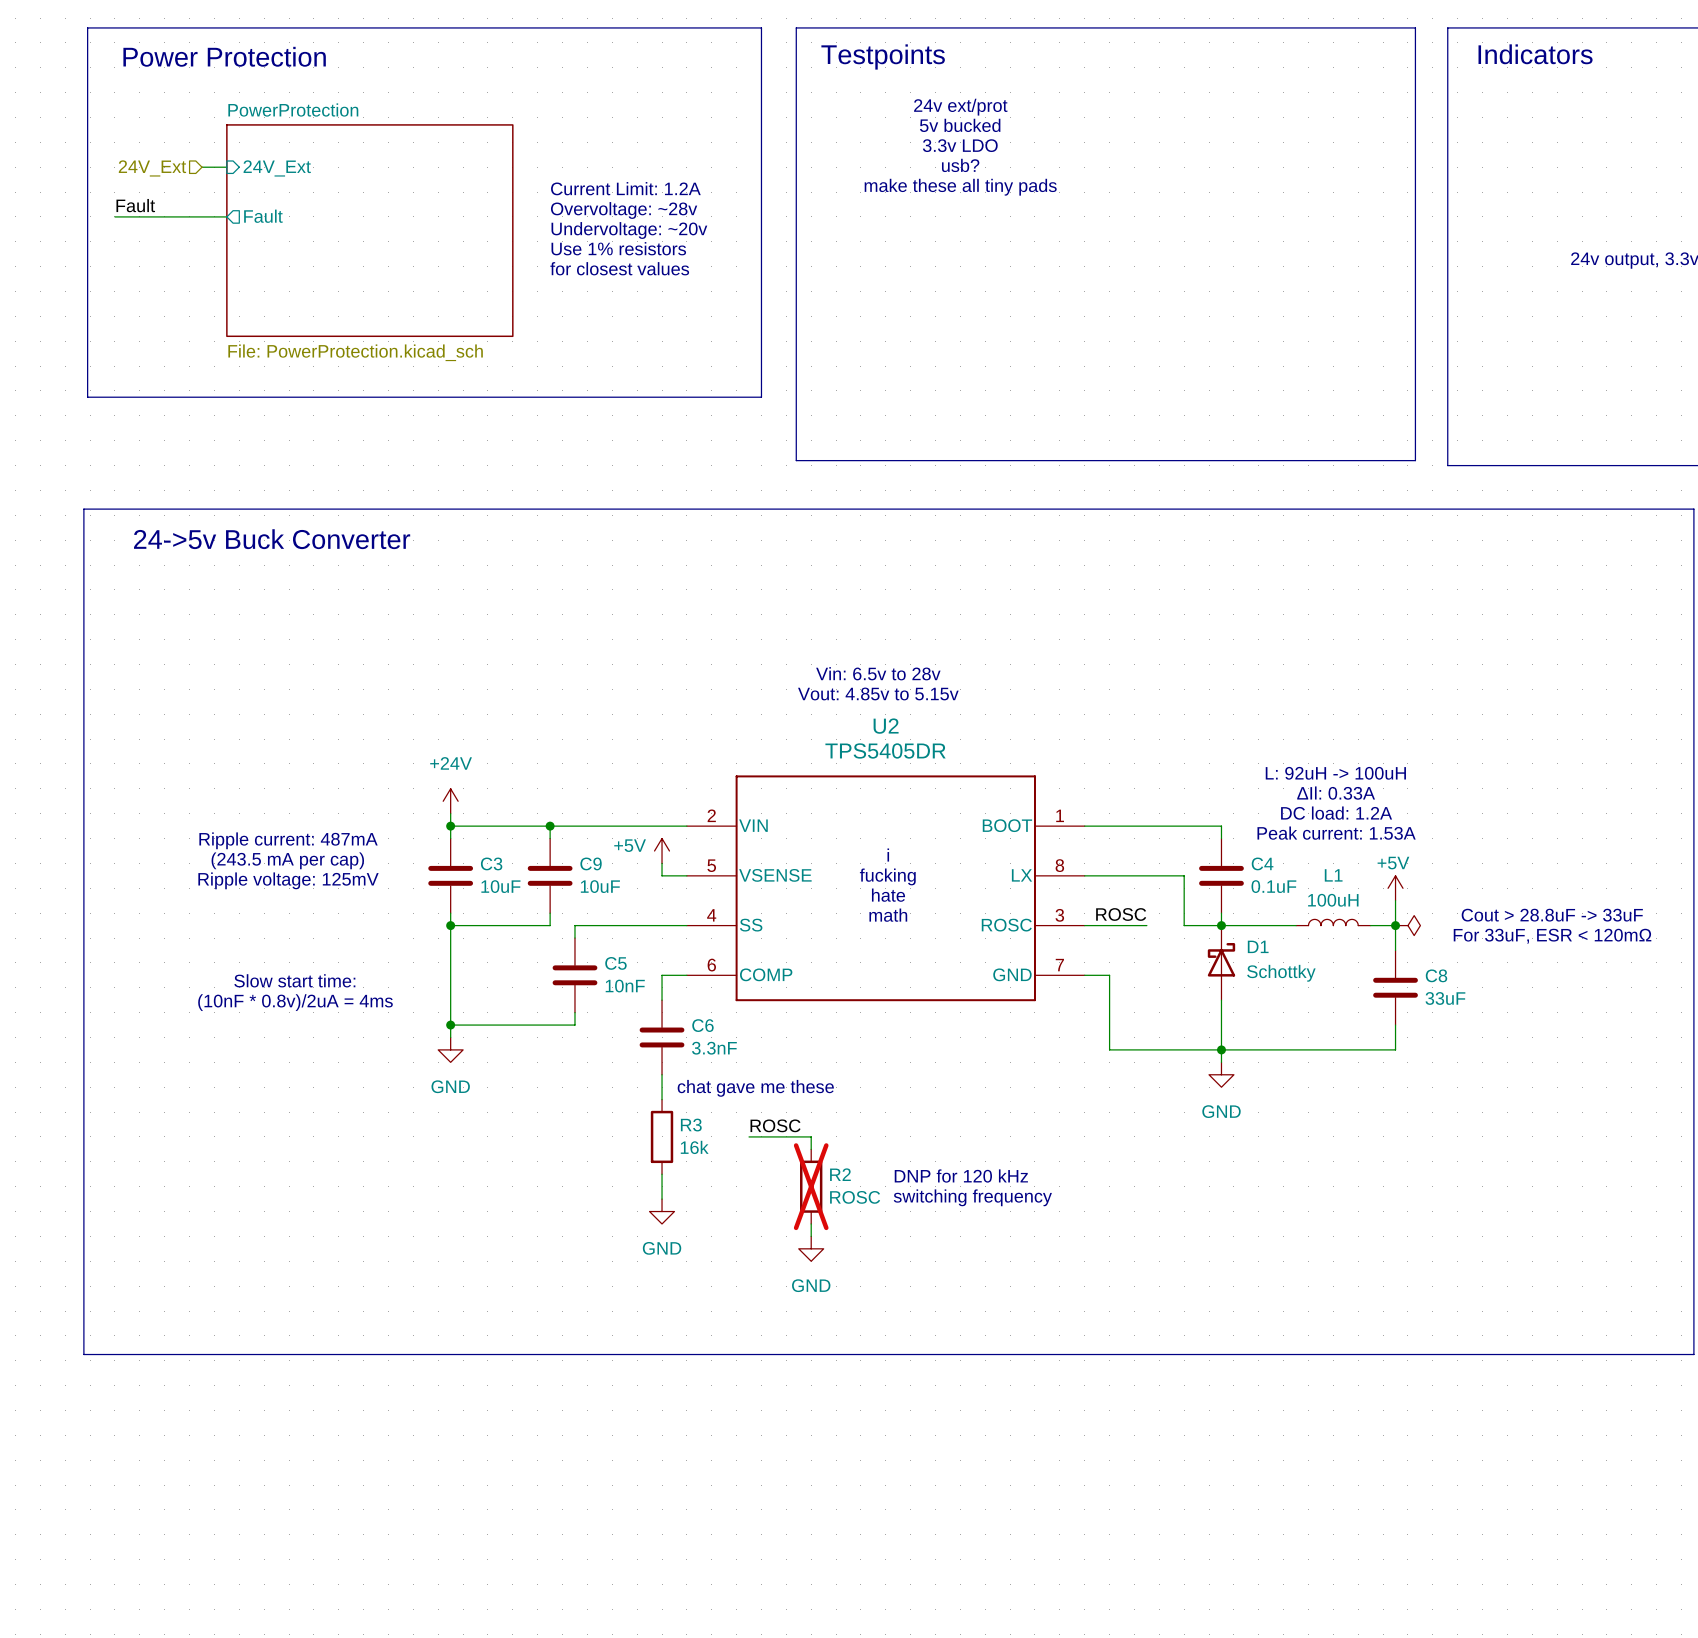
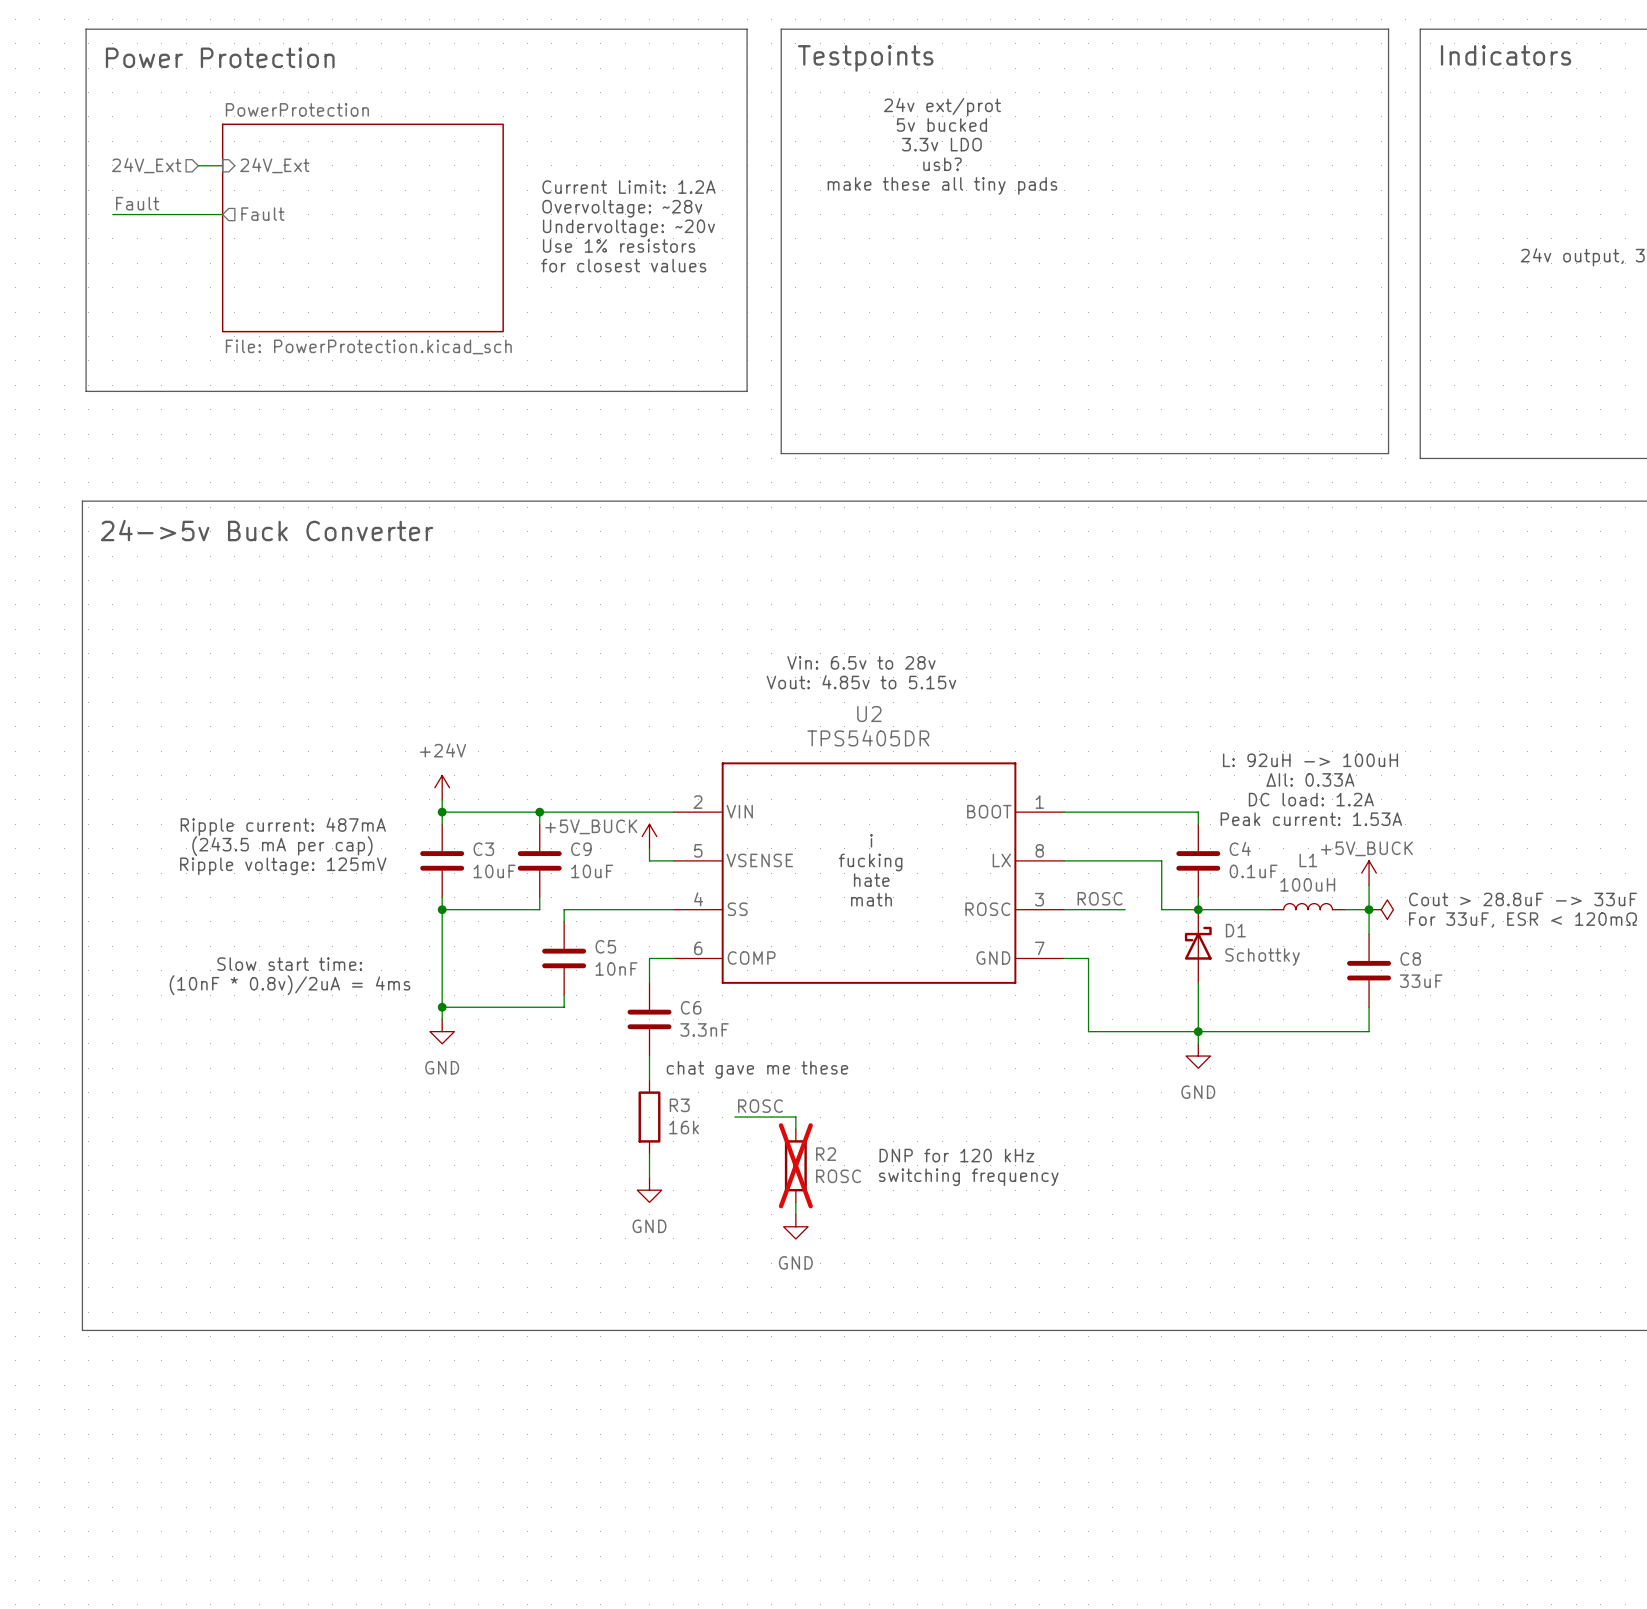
power symbol: +5V (662, 851) -> +5V_BUCK (649, 836)
power symbol: +5V (1395, 888) -> +5V_BUCK (1369, 873)

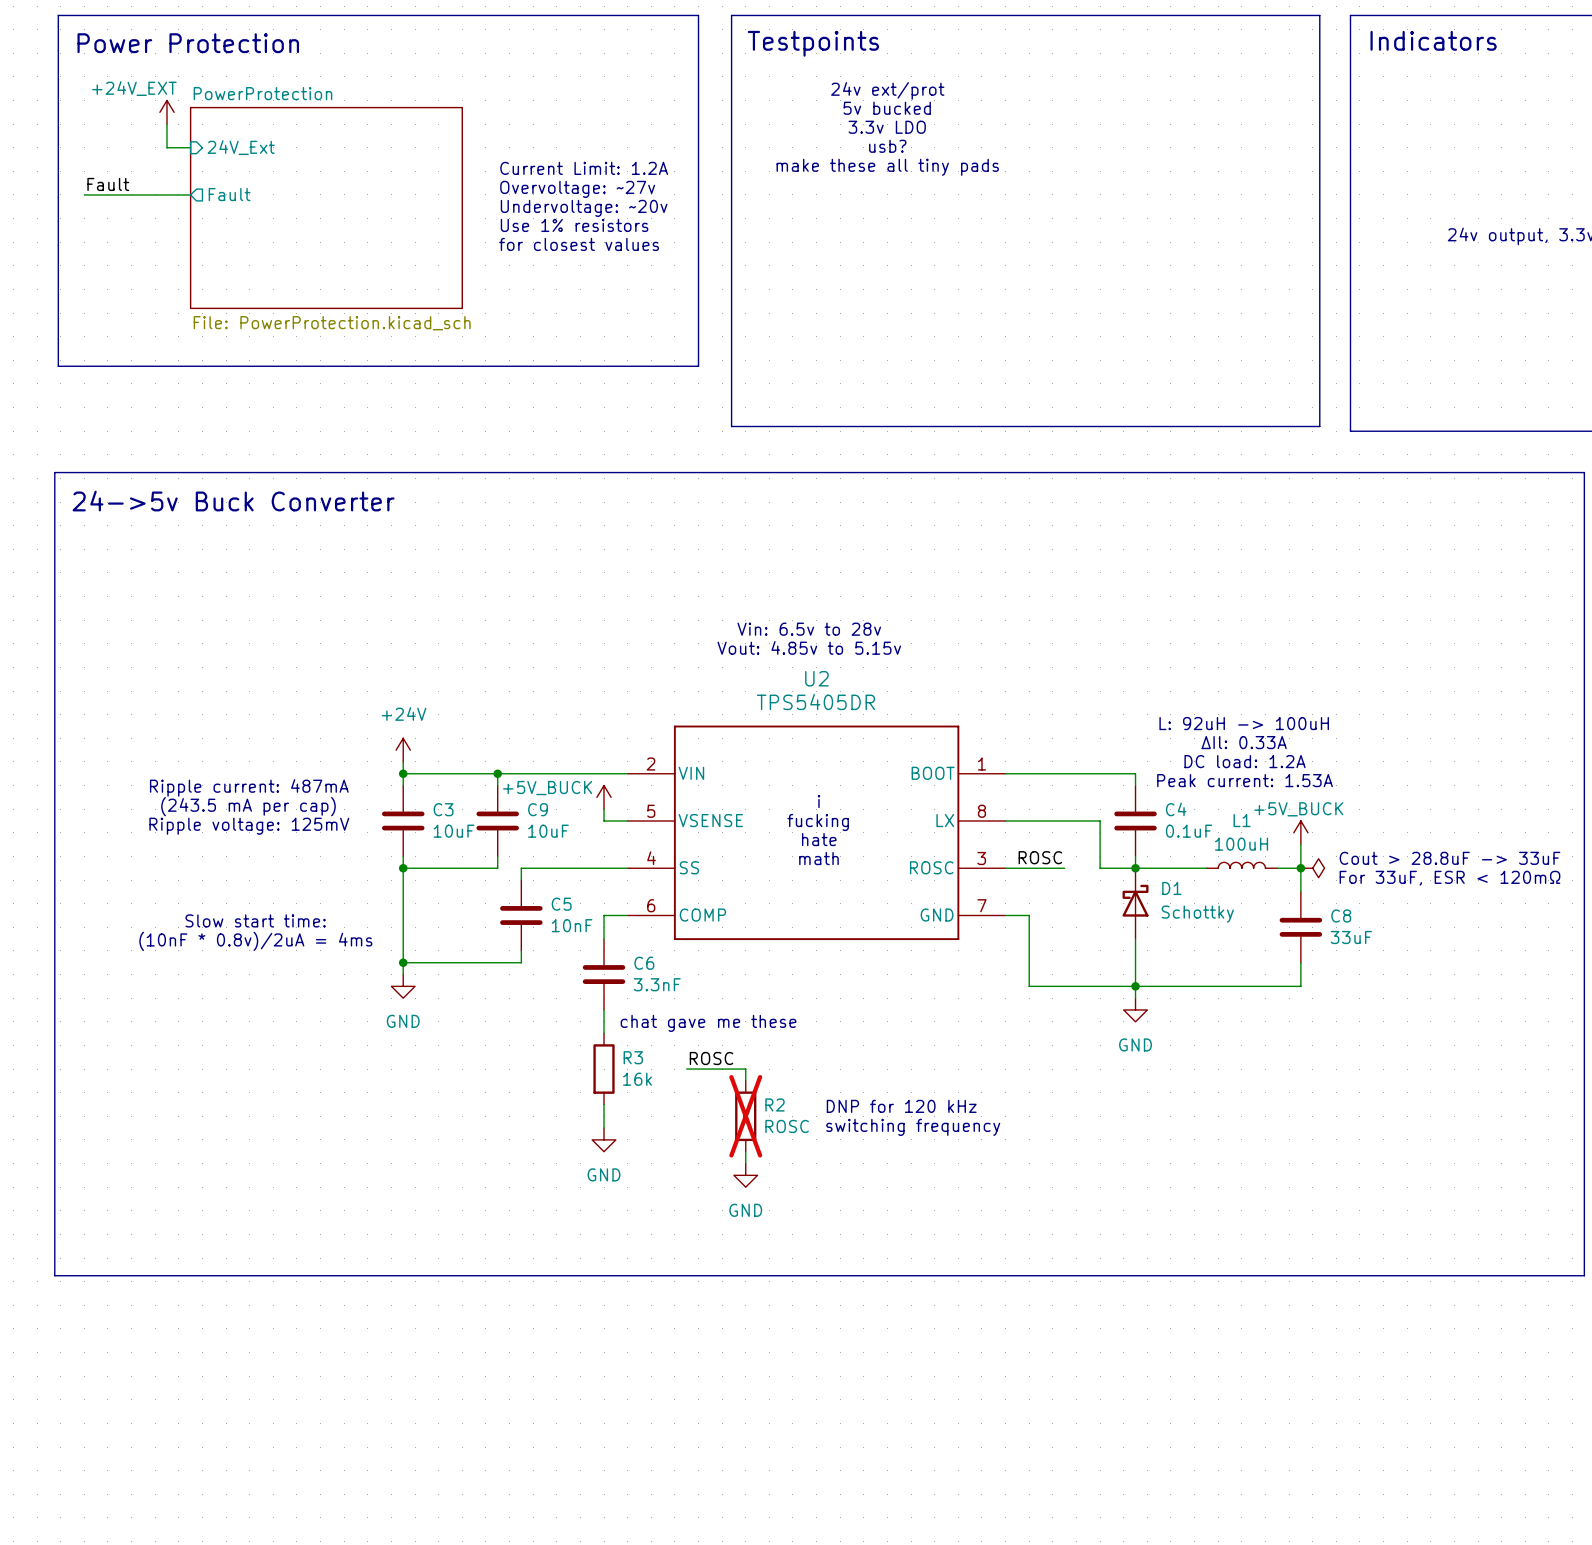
power symbol: none -> +24V_EXT (166, 112)
wire: none -> (166, 124) (166, 147)
hierarchical label: 24V_Ext (146, 165) -> none
text: Overvoltage: ~28v (622, 208) -> Overvoltage: ~27v (577, 189)

